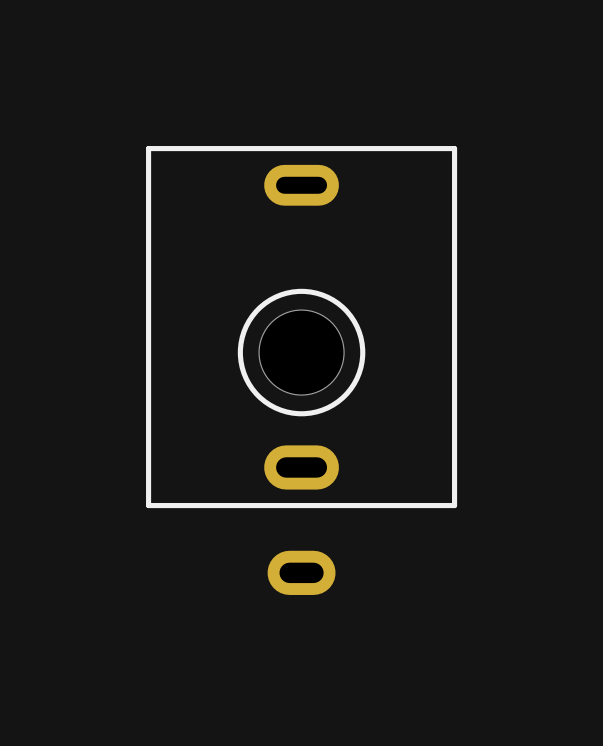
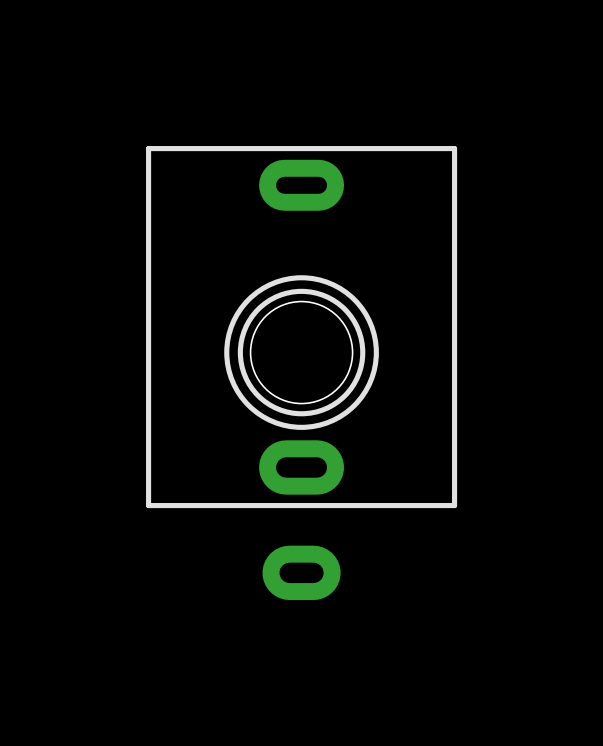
part footprint: [146, 146, 458, 595] -> [146, 146, 458, 601]

